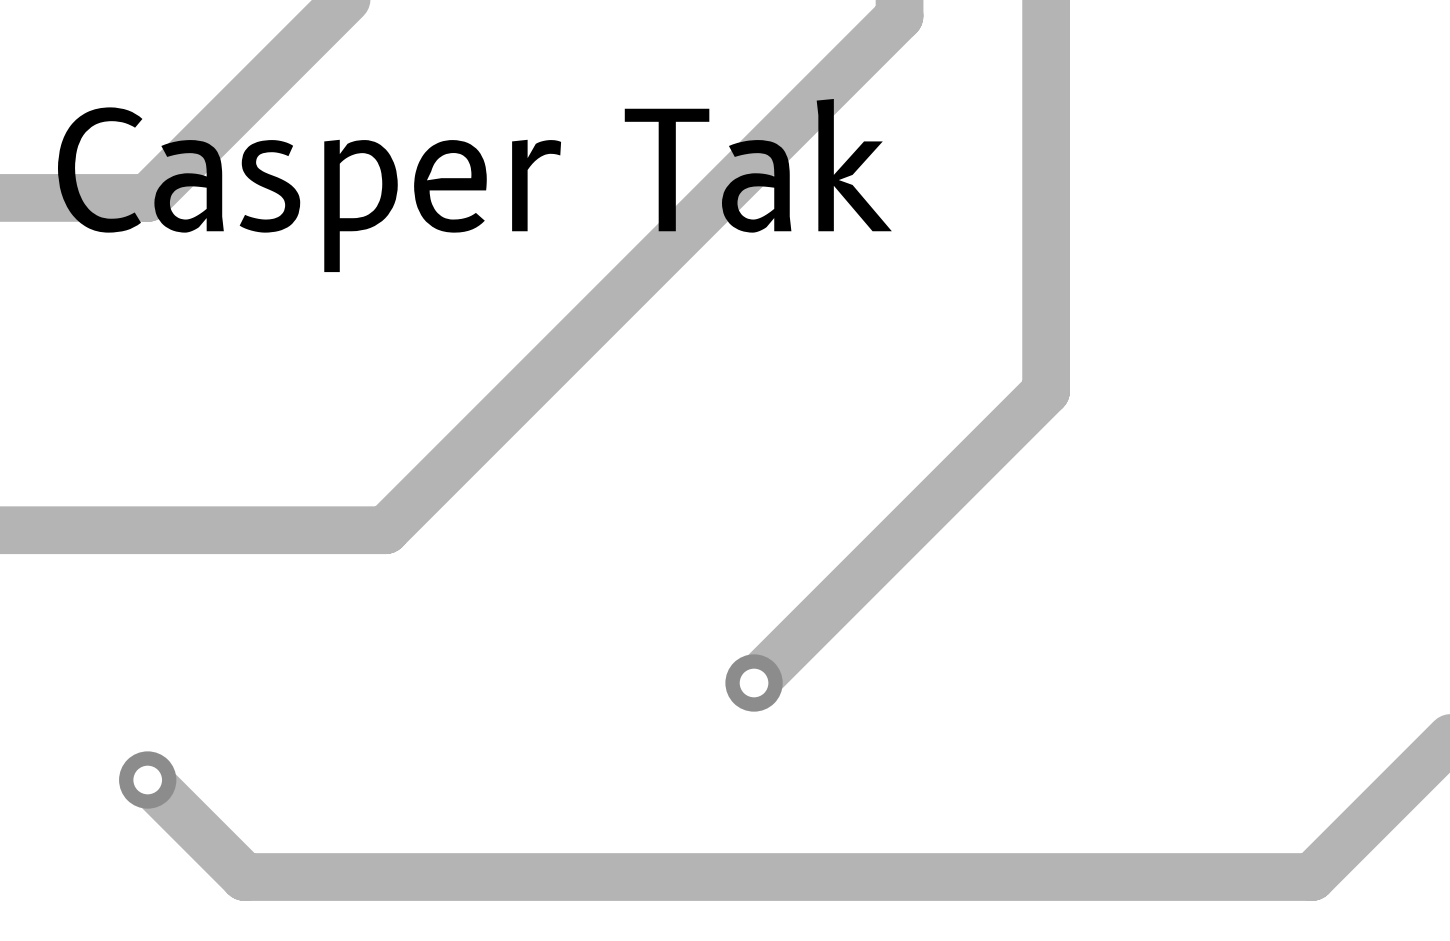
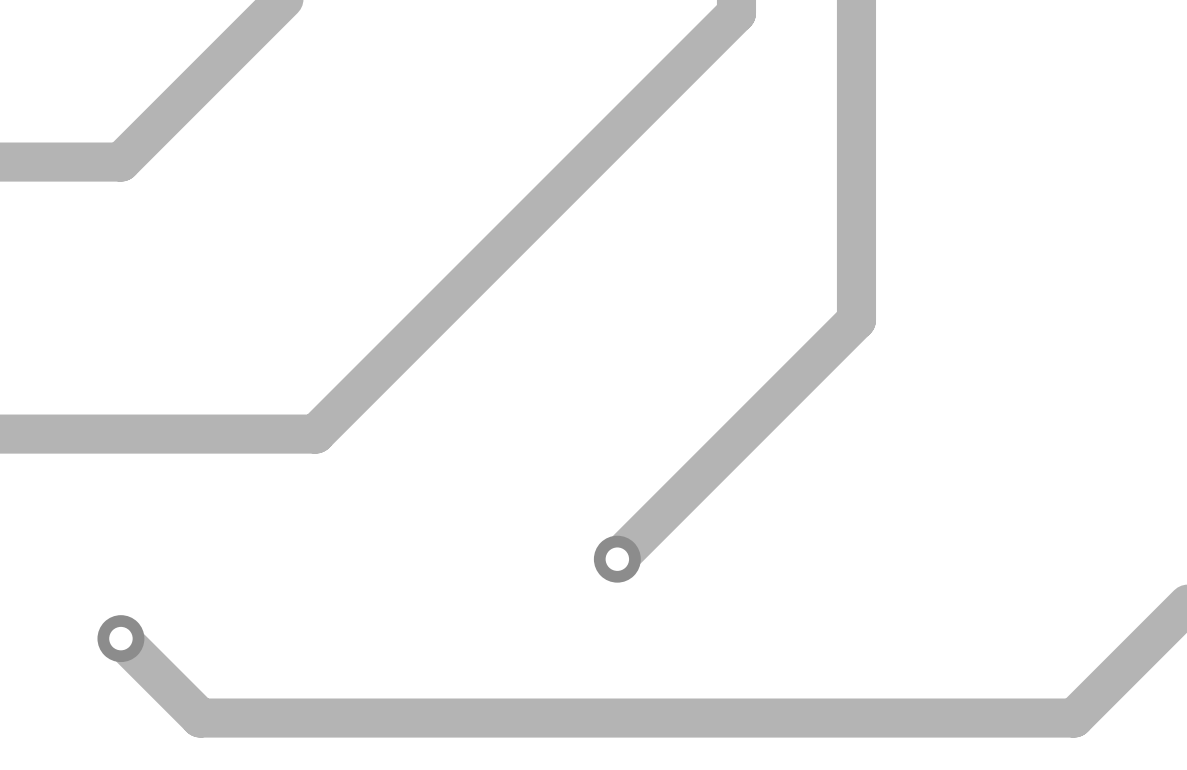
text: Casper Tak (474, 185) -> none

